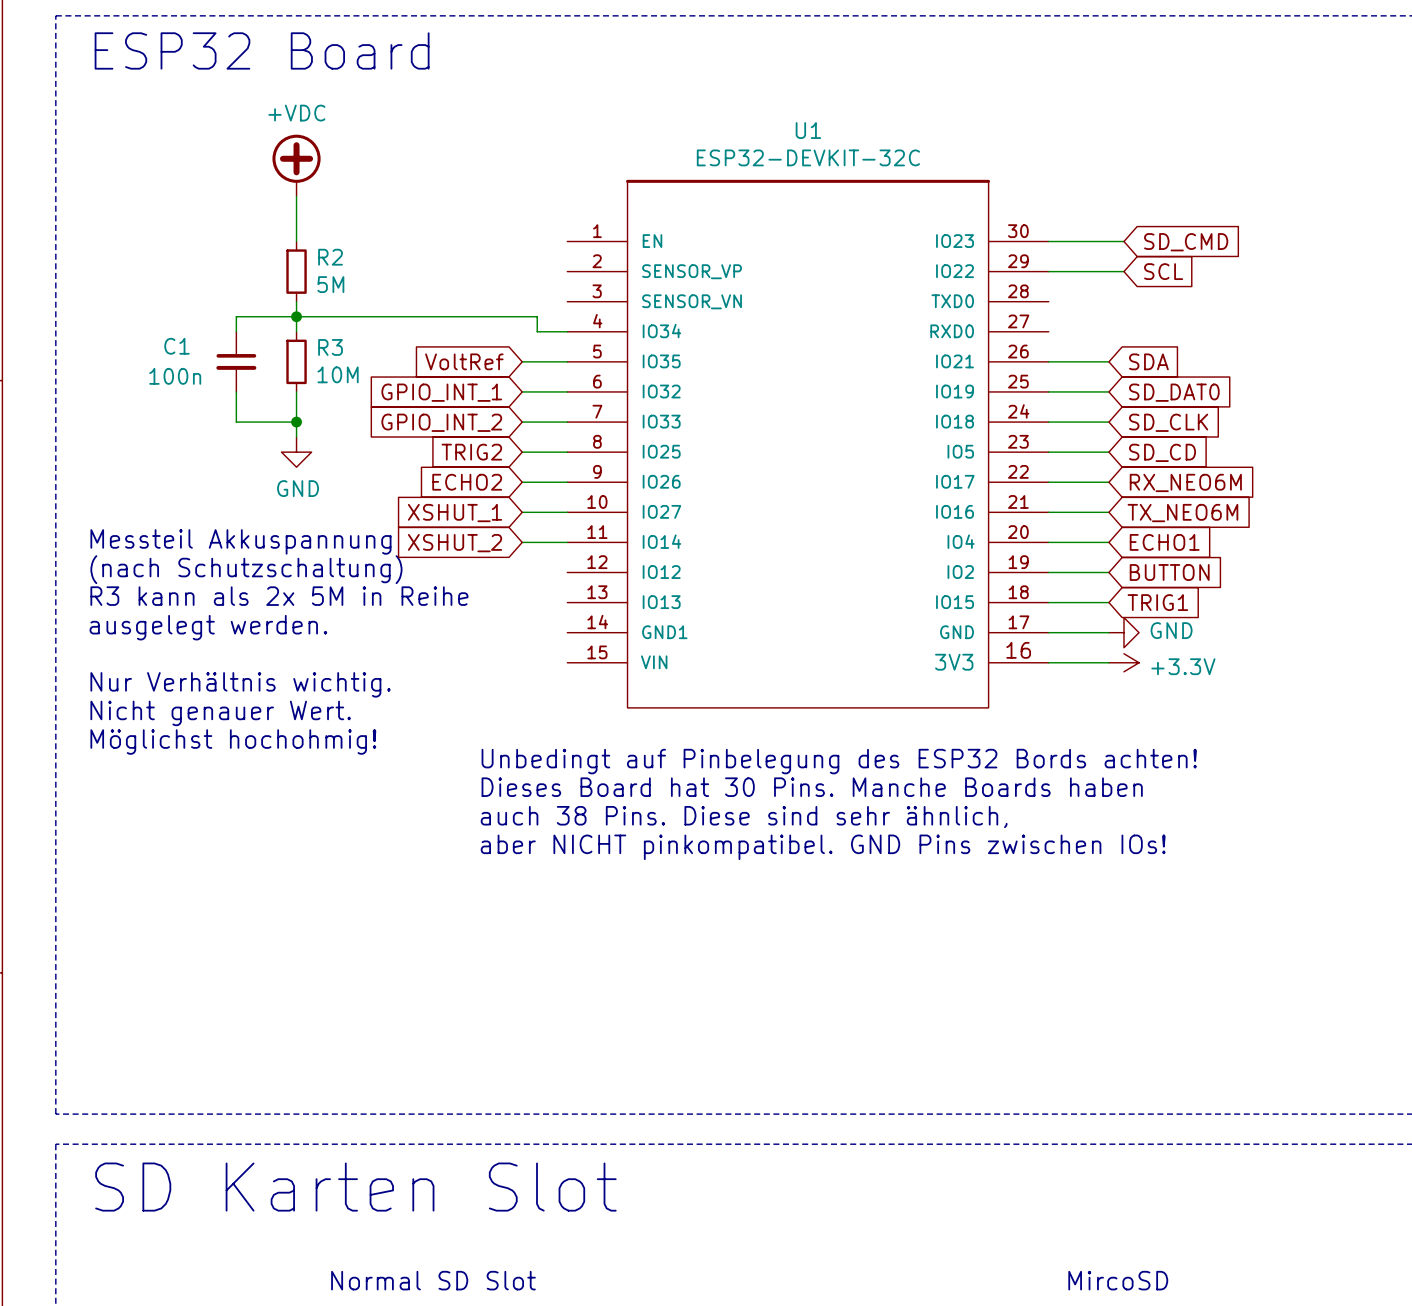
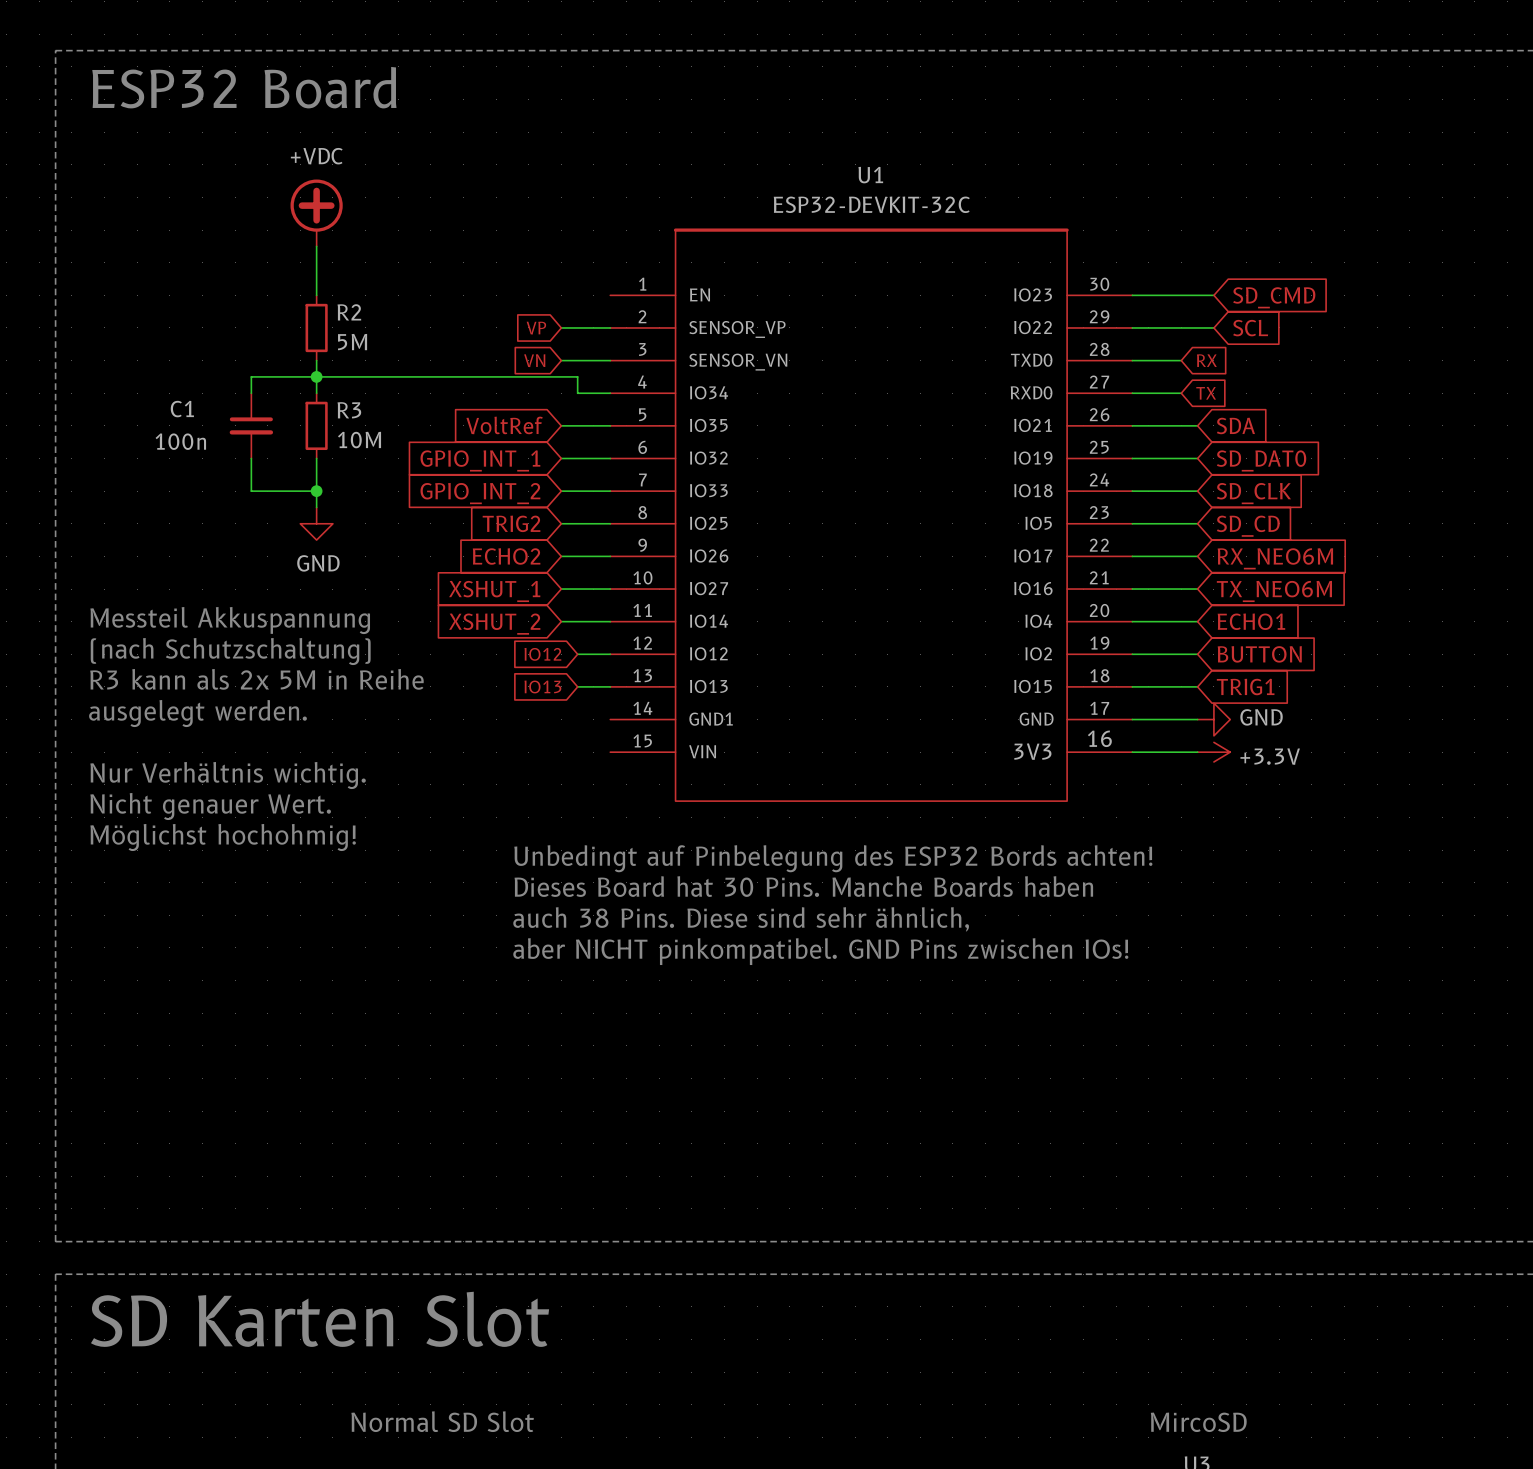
global label: none -> VP (536, 328)
wire: none -> (561, 327) (610, 327)
global label: none -> VN (534, 360)
wire: none -> (561, 360) (610, 360)
wire: none -> (1132, 360) (1181, 360)
global label: none -> RX (1206, 360)
wire: none -> (1132, 393) (1181, 393)
global label: none -> TX (1206, 393)
global label: none -> IO12 (542, 654)
wire: none -> (577, 654) (610, 654)
global label: none -> IO13 (542, 686)
wire: none -> (577, 686) (610, 686)

